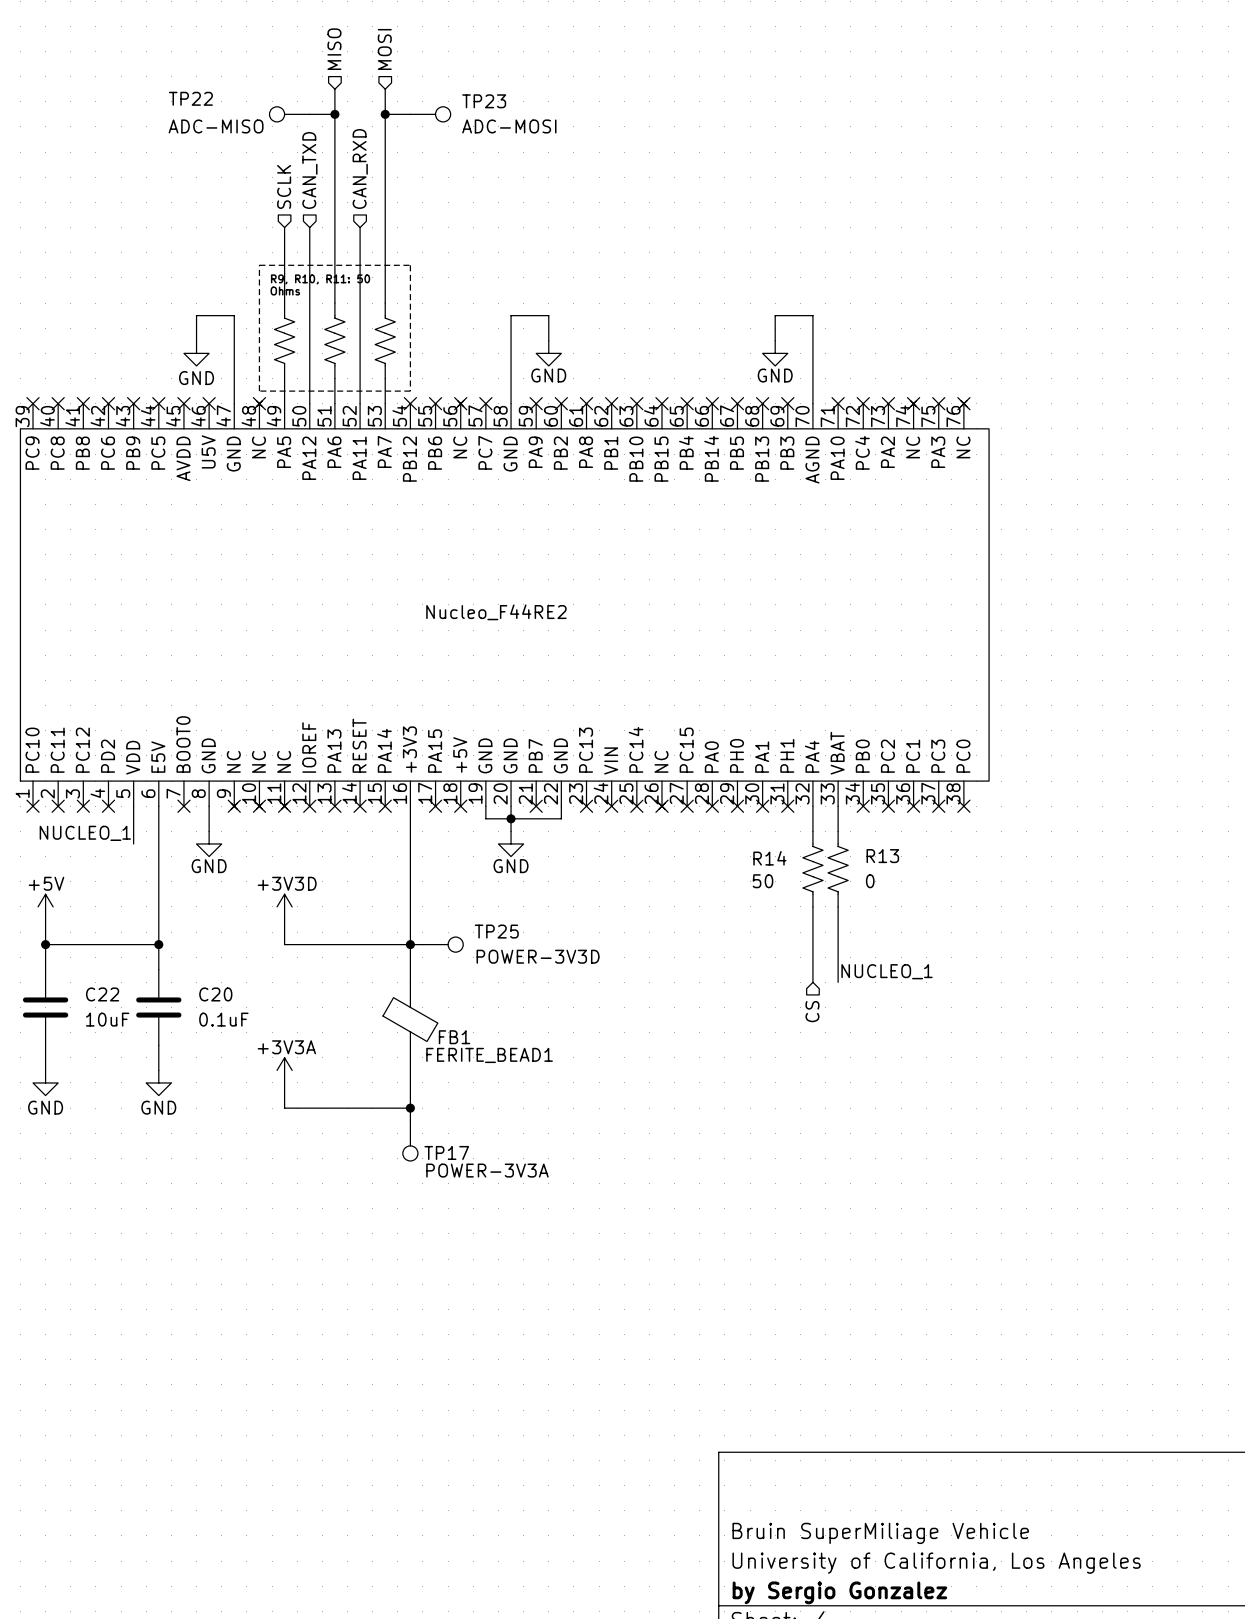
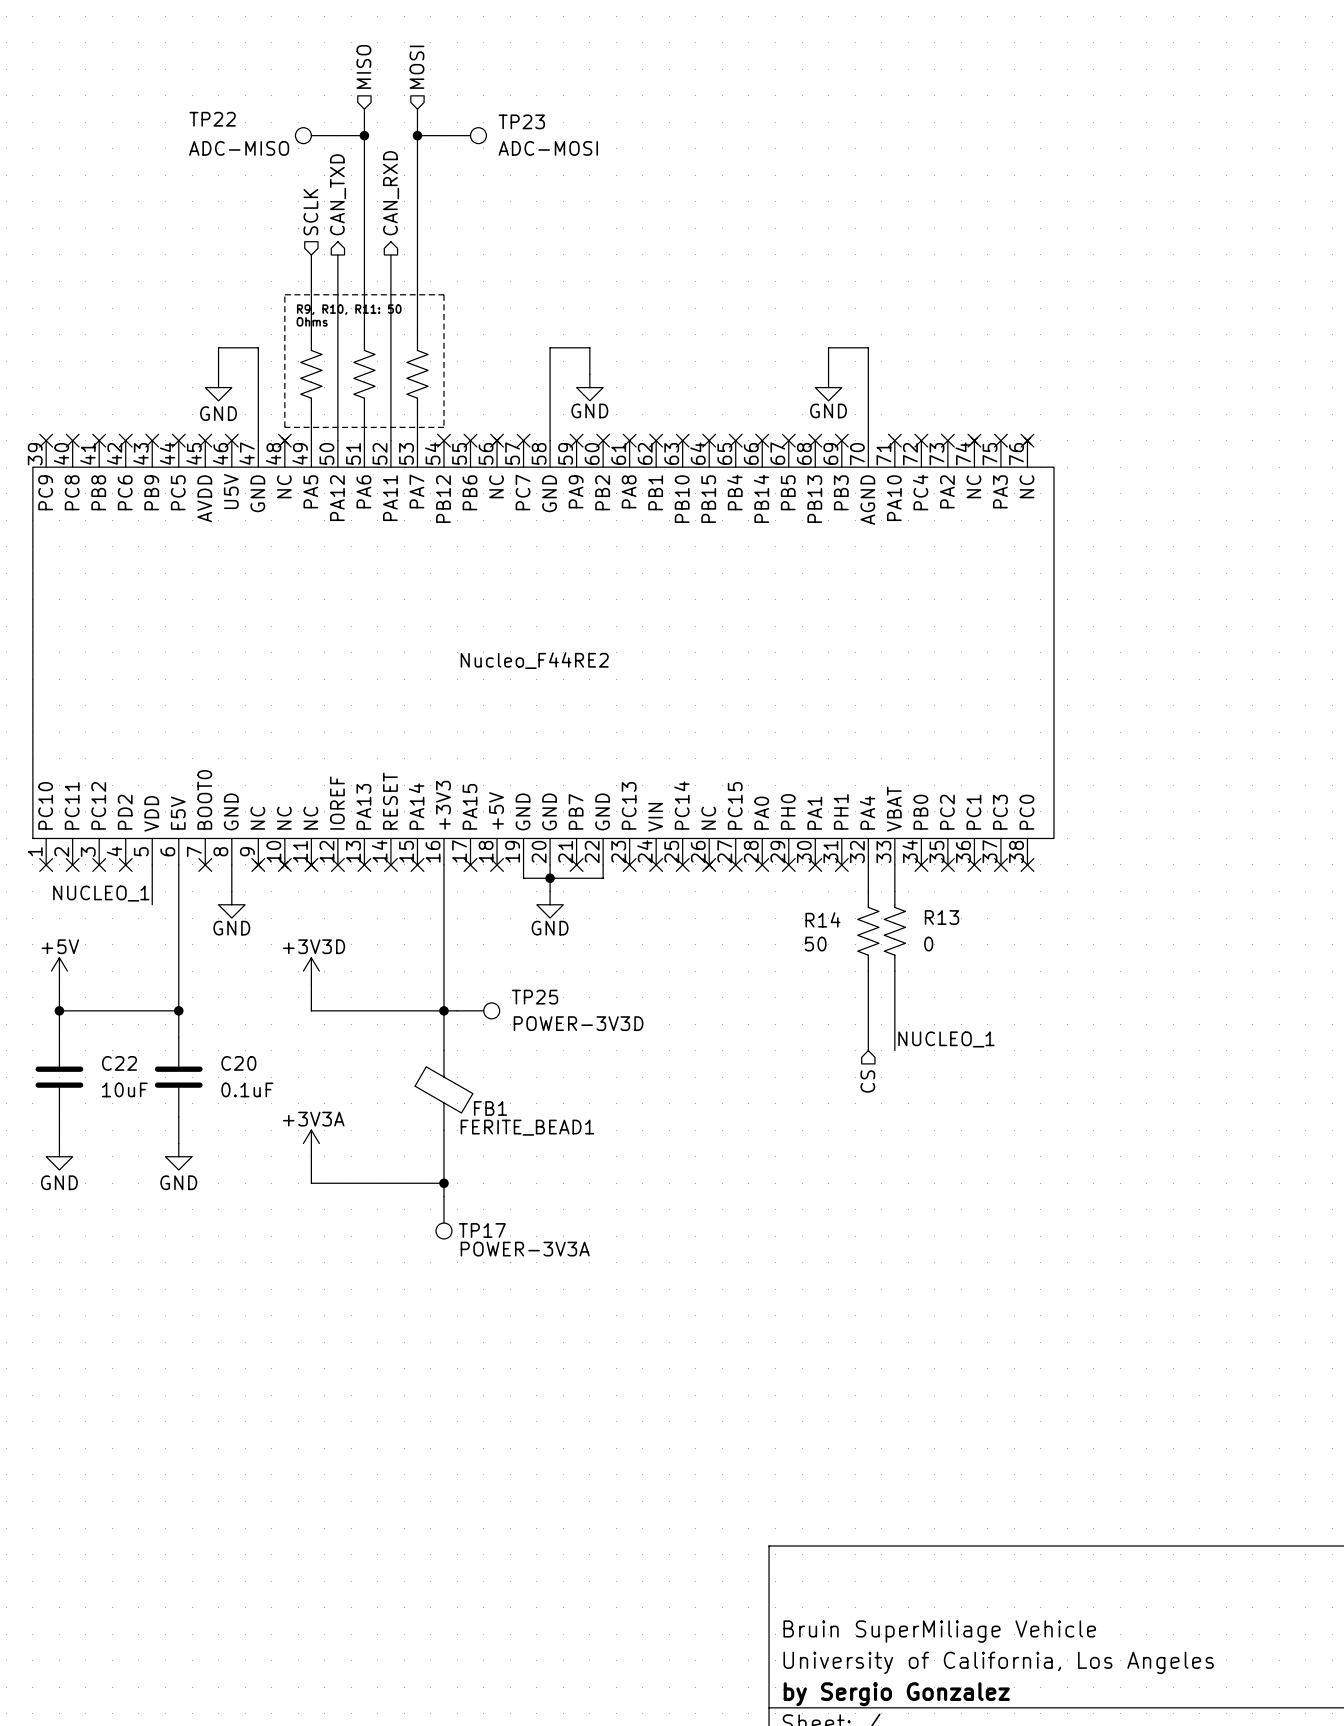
hierarchical label shape: input (360, 168) -> output (391, 193)
hierarchical label shape: input (309, 170) -> output (338, 194)

